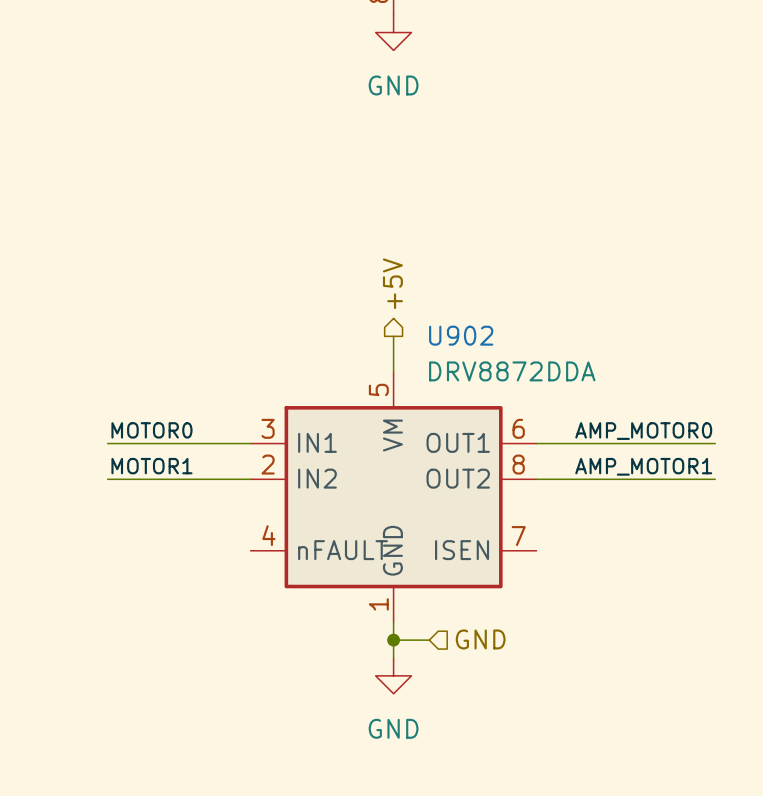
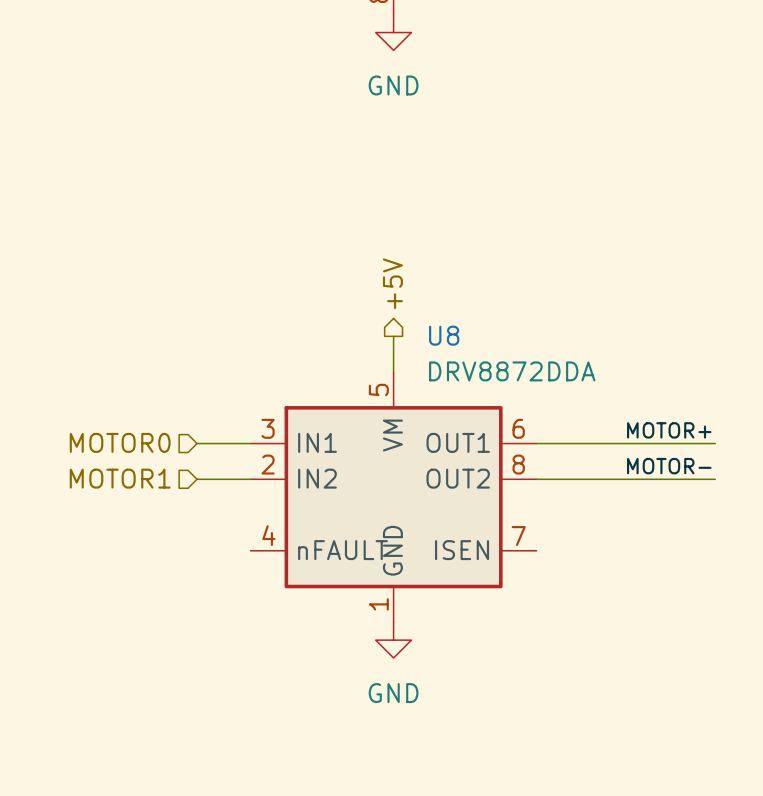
U902 name: U902 (461, 335) -> U8 (444, 335)
label: MOTOR0 (151, 430) -> none
label: AMP_MOTOR0 (643, 431) -> MOTOR+ (669, 430)
hierarchical label: none -> MOTOR0 (120, 442)
wire: (107, 443) (197, 443) -> none
label: MOTOR1 (151, 466) -> none
label: AMP_MOTOR1 (643, 466) -> MOTOR- (669, 466)
hierarchical label: none -> MOTOR1 (120, 478)
wire: (107, 479) (197, 479) -> none
hierarchical label: GND (480, 639) -> none
wire: (393, 640) (429, 640) -> none
junction: (393, 640) -> none
power symbol position: GND (393, 675) -> GND (393, 640)

